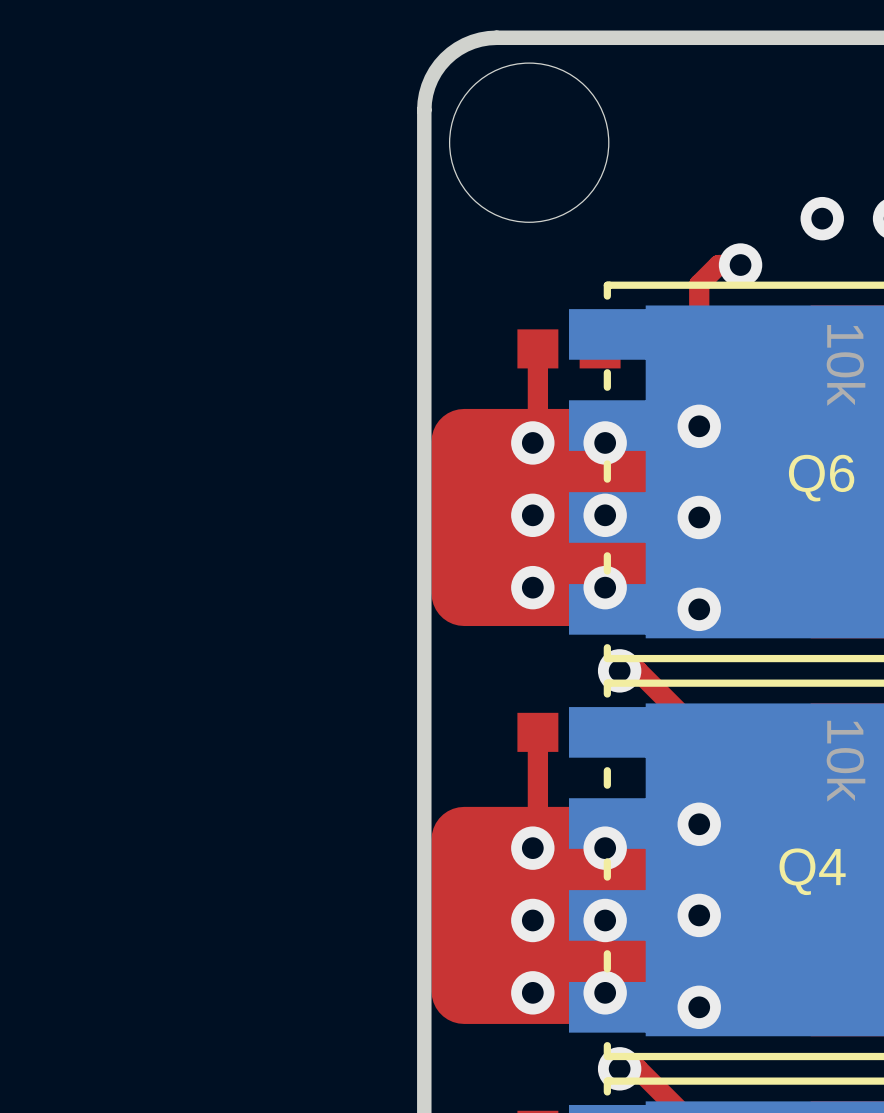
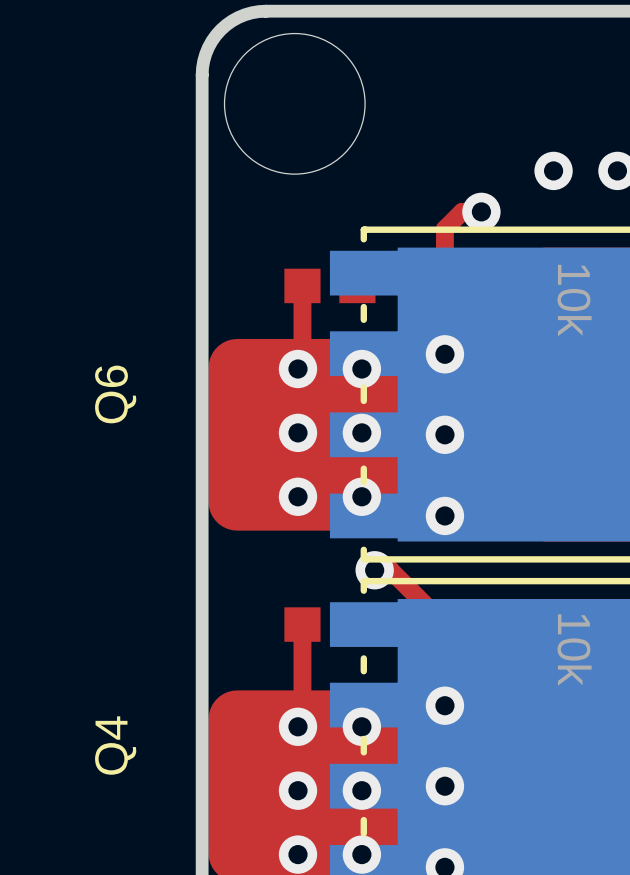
Q6 name rotation: 0° (821, 478) -> 90° counterclockwise (115, 394)
Q6 name position: Q6 (821, 478) -> Q6 (115, 394)
Q4 name rotation: 0° (812, 871) -> 90° counterclockwise (115, 745)
Q4 name position: Q4 (812, 871) -> Q4 (115, 745)

